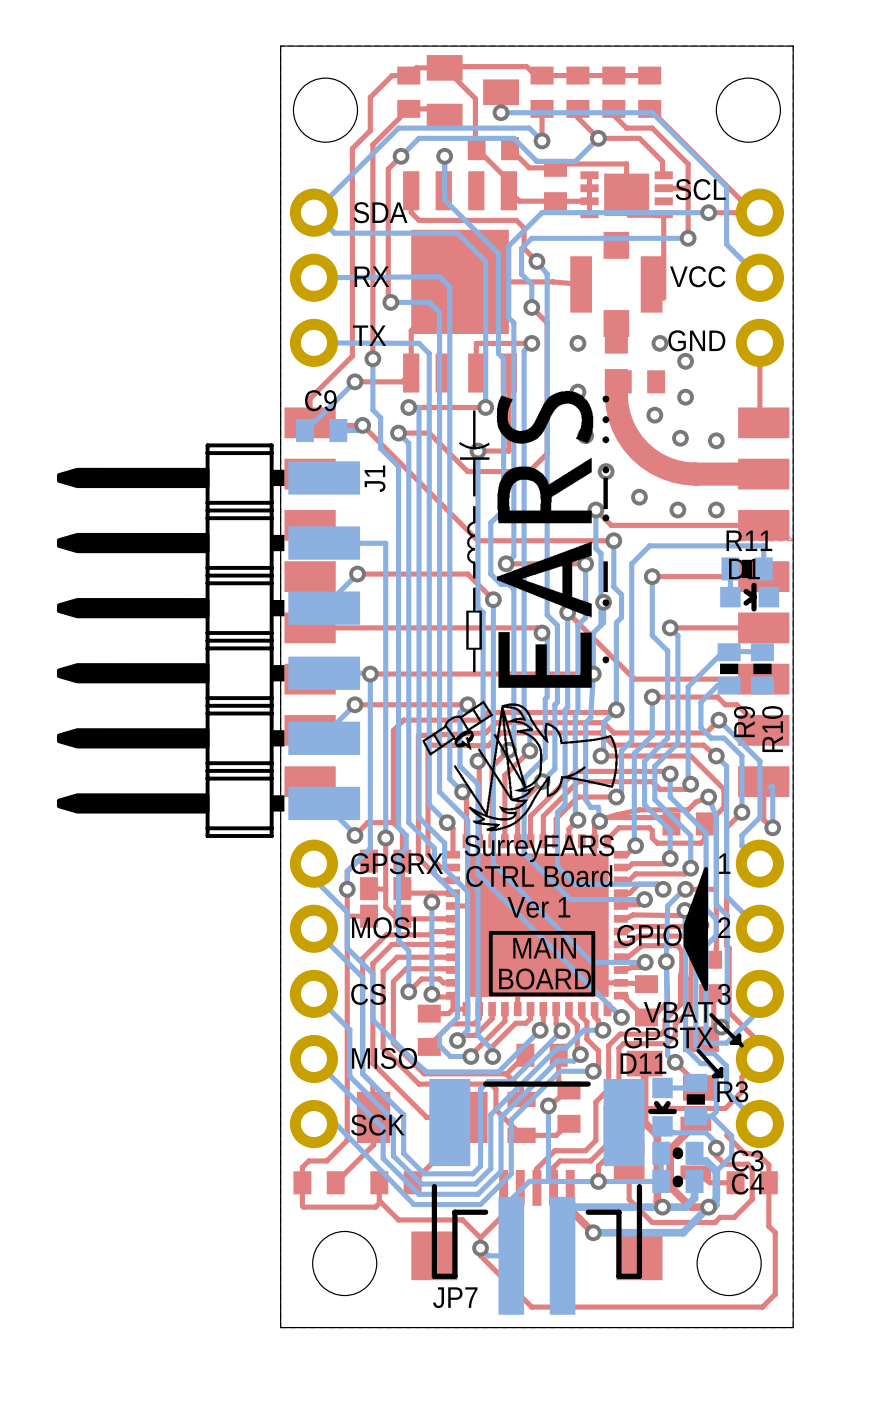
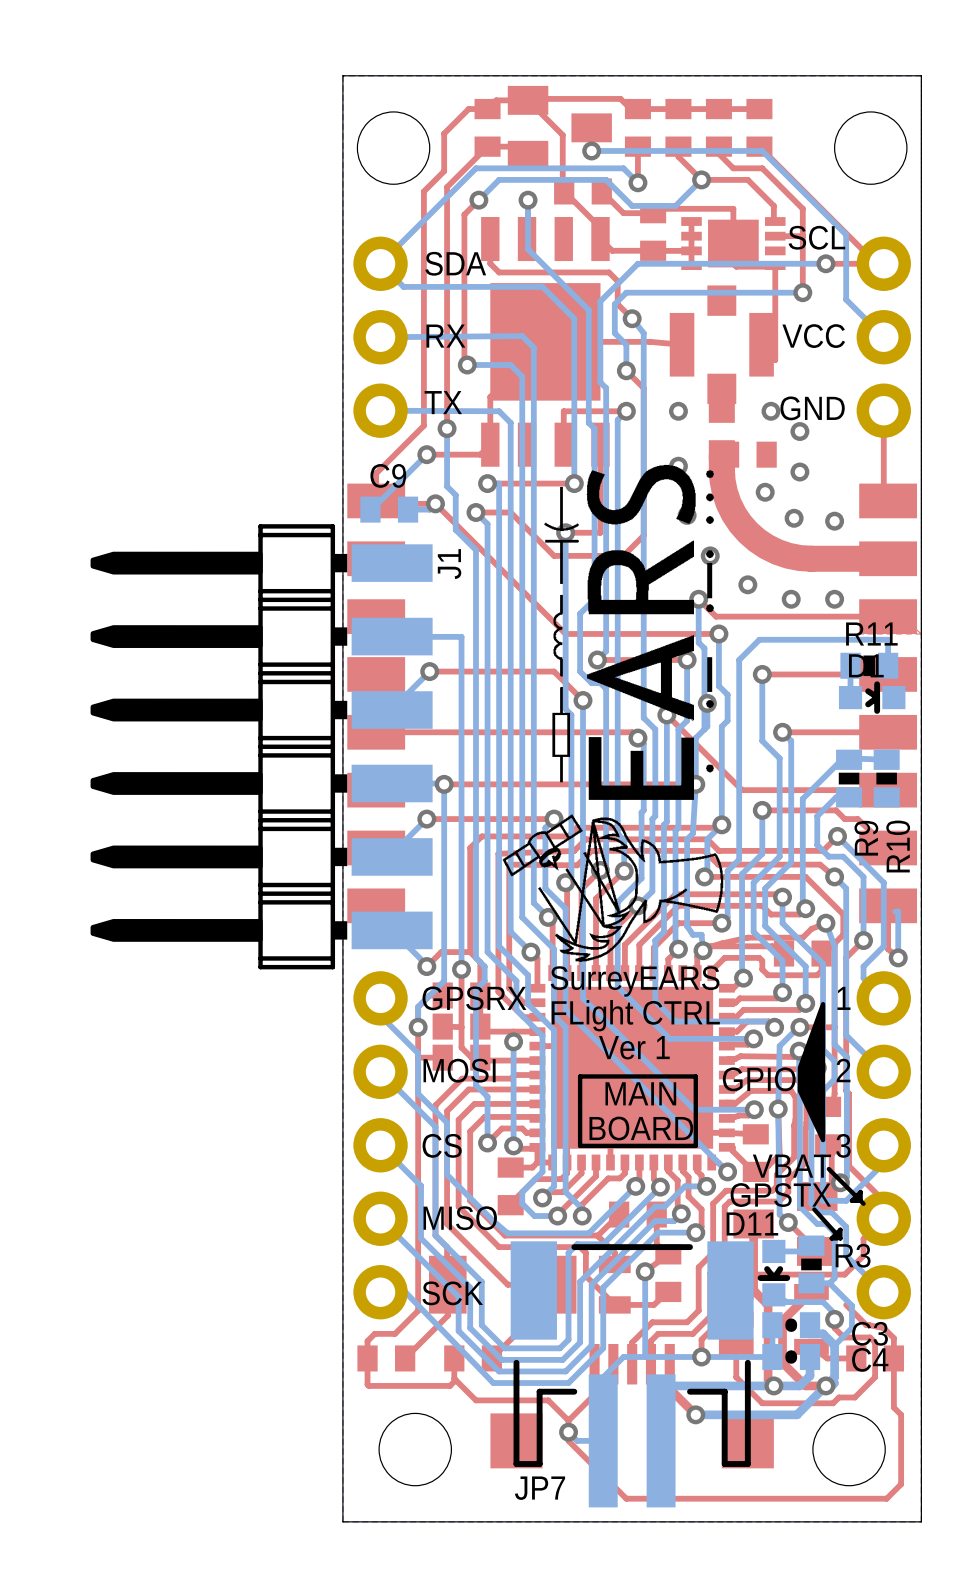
text: CTRL Board (539, 876) -> FLight CTRL (635, 1015)

